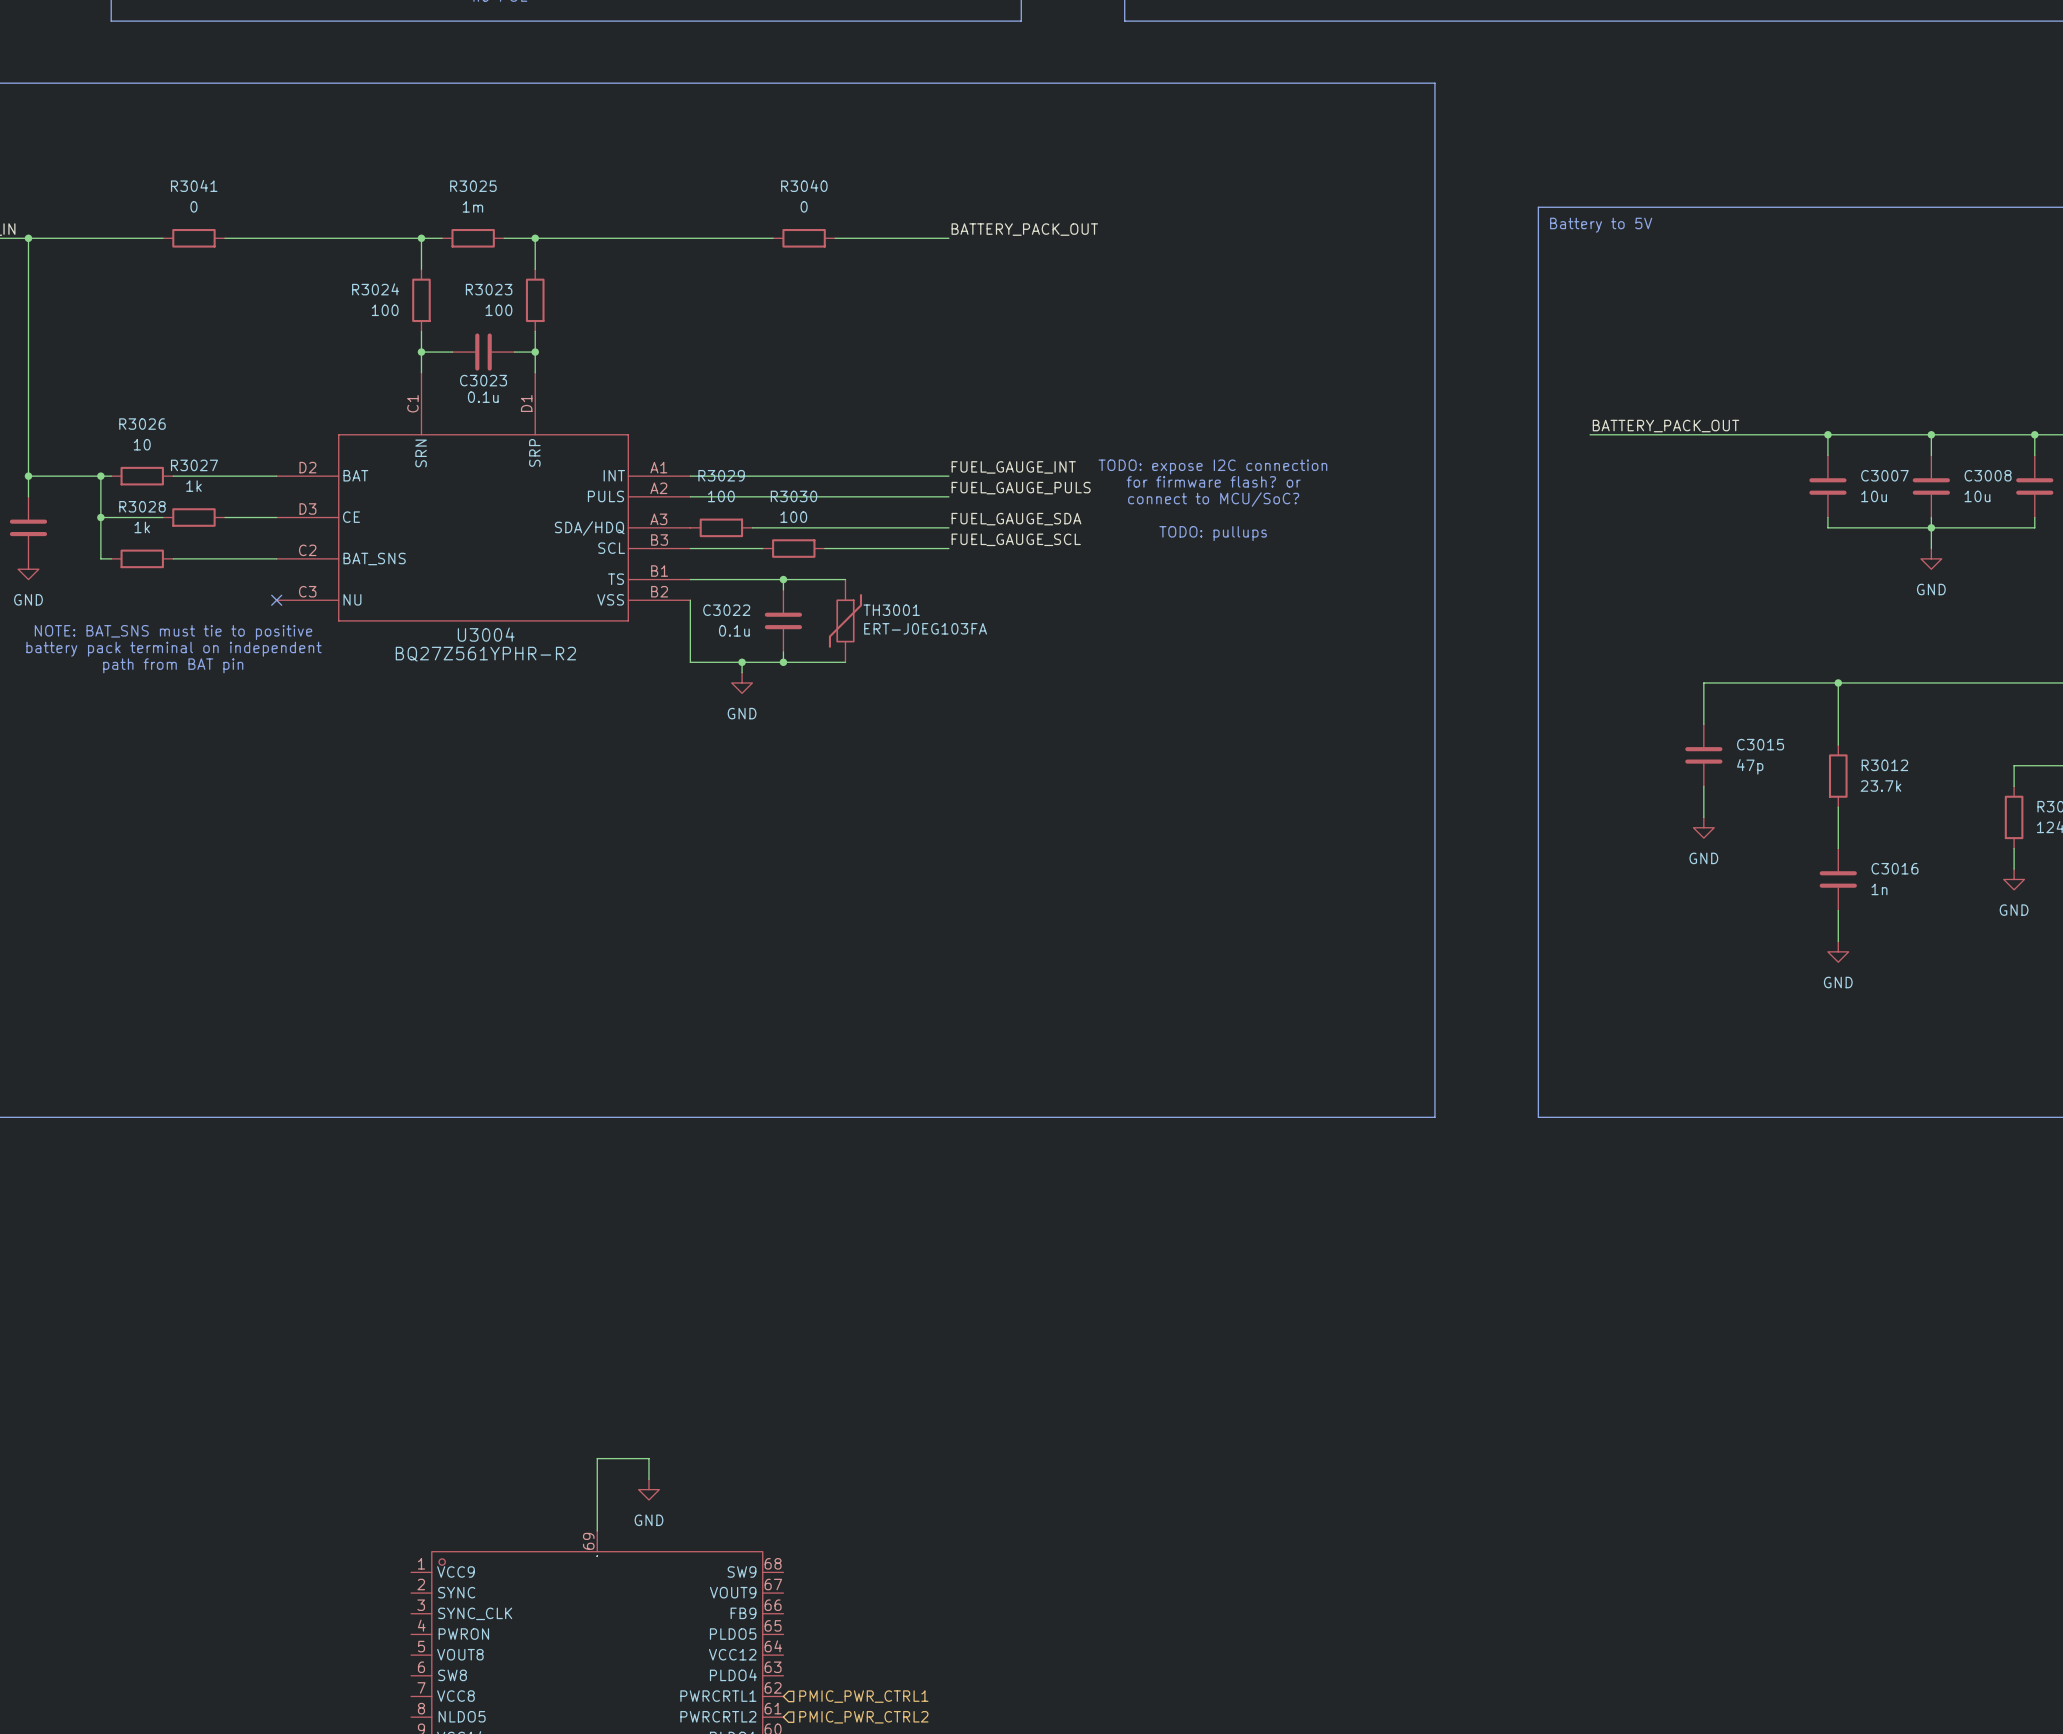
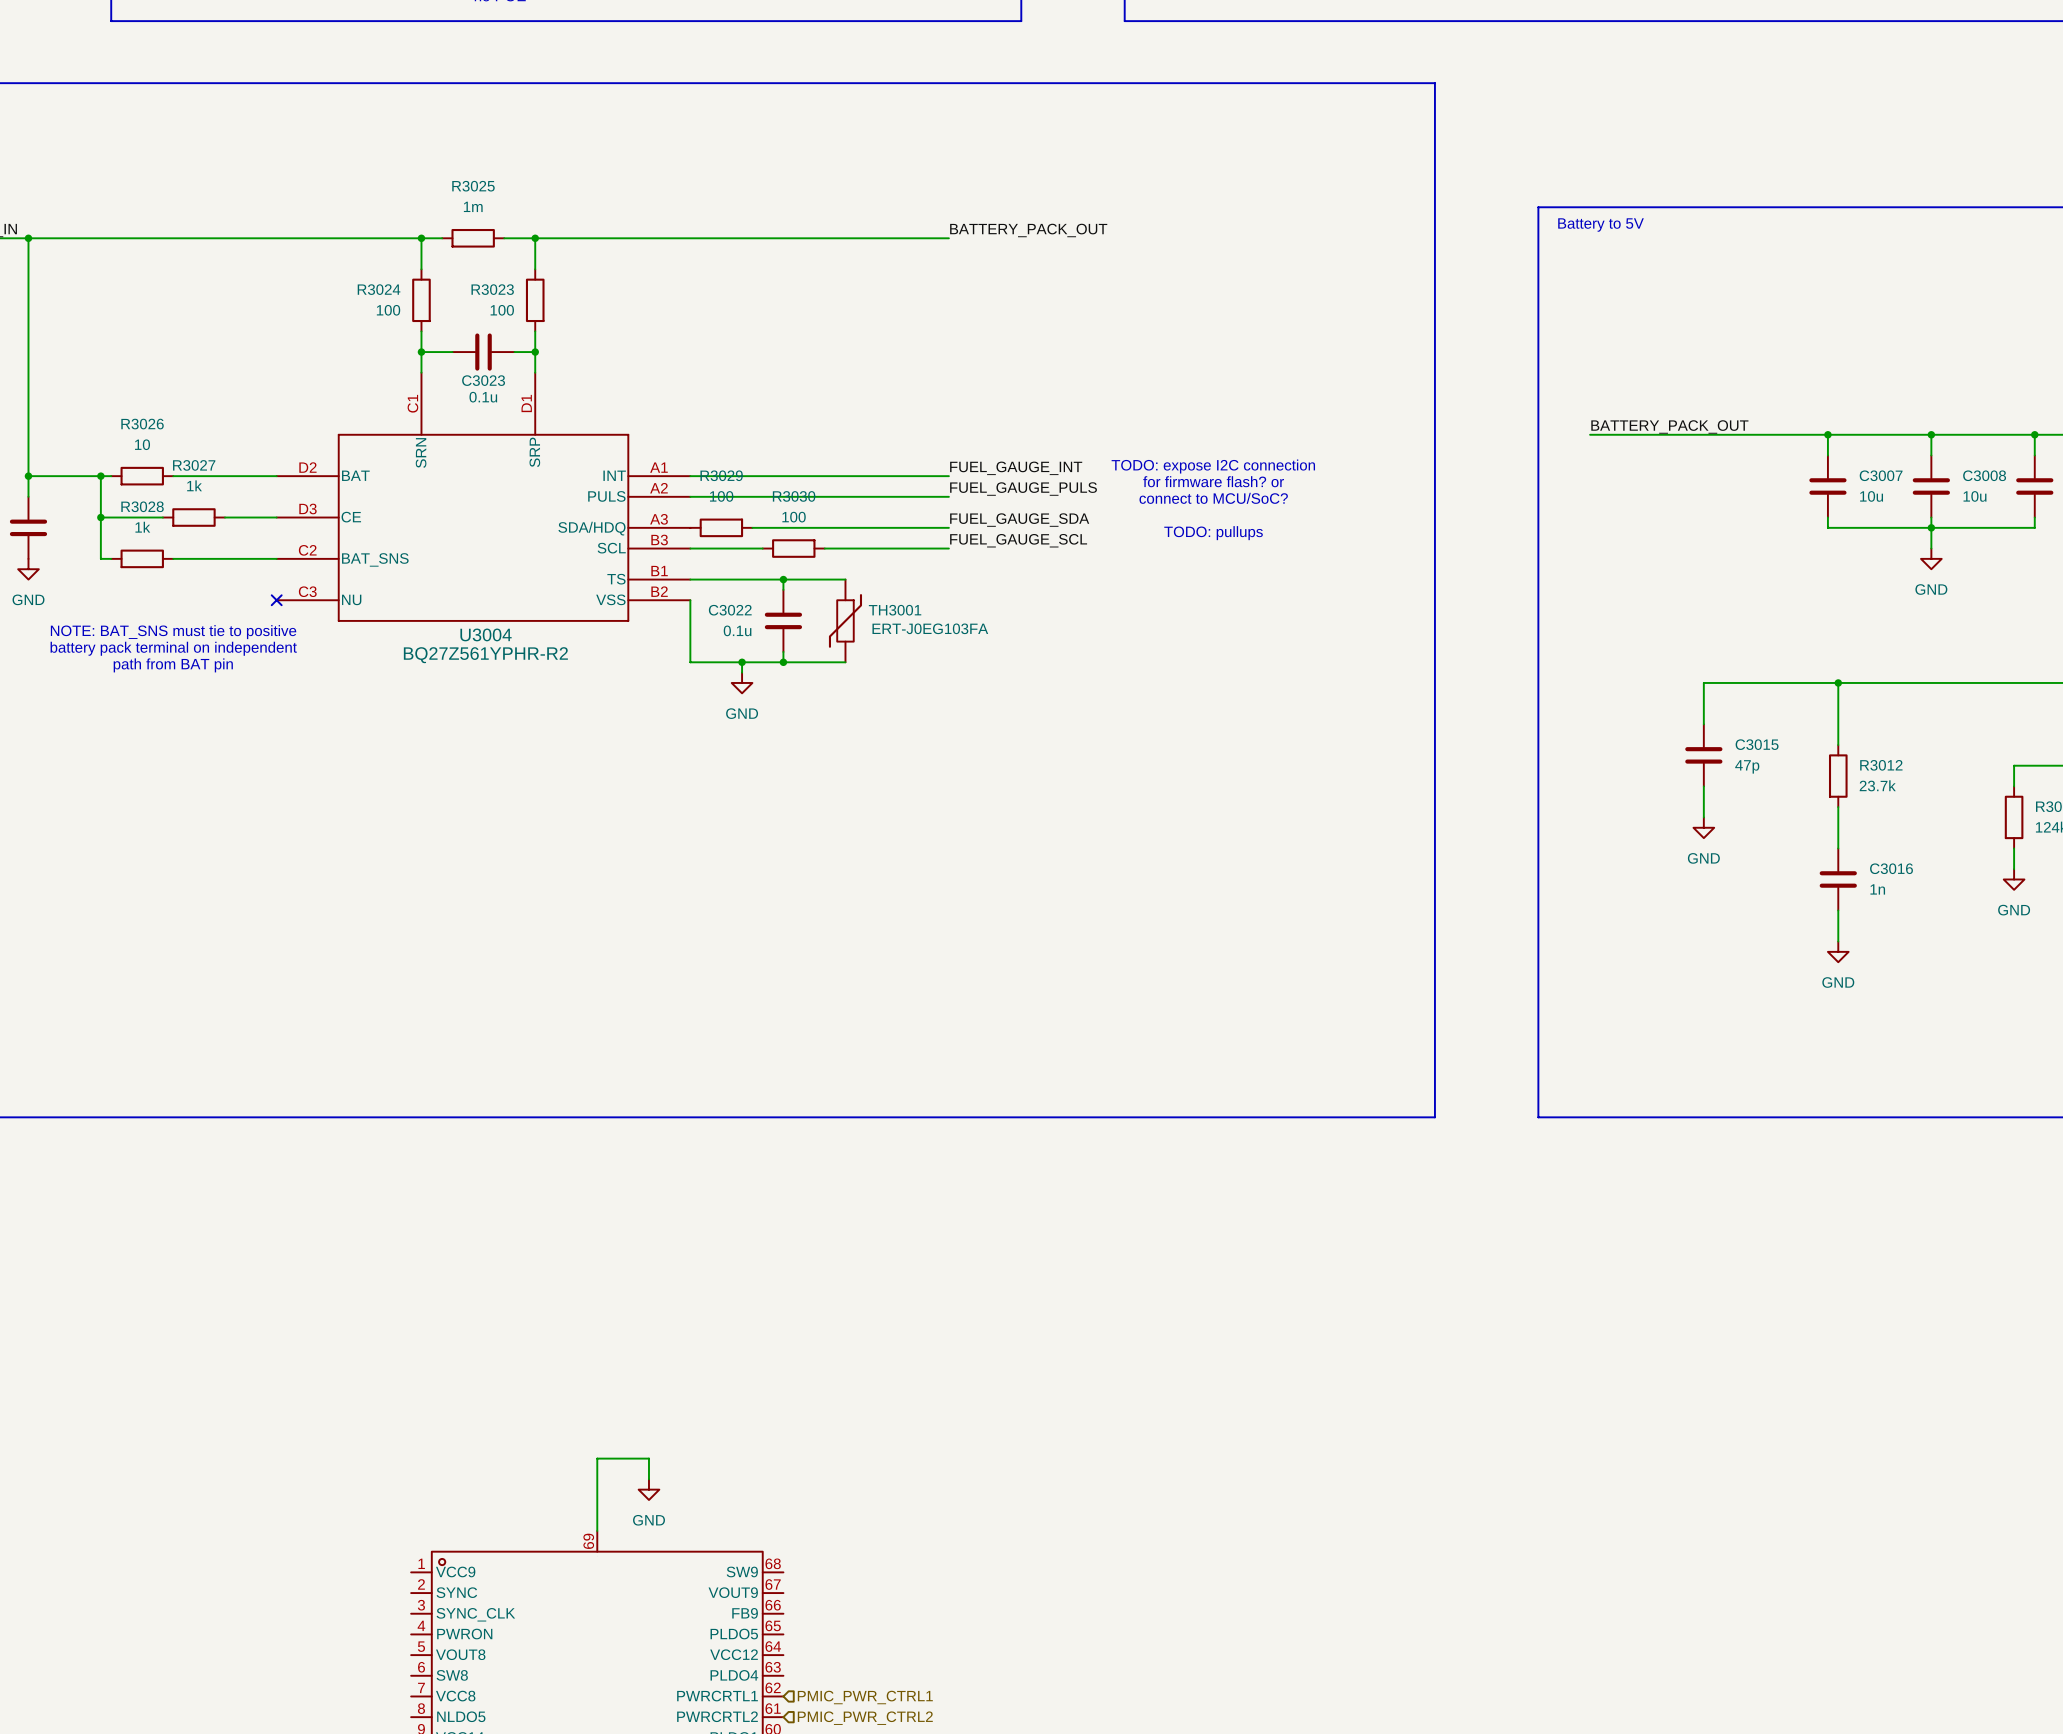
wire: none -> (162, 238) (224, 238)
R3041: 0 (193, 238) -> none
wire: none -> (773, 238) (835, 238)
R3040: 0 (804, 238) -> none

